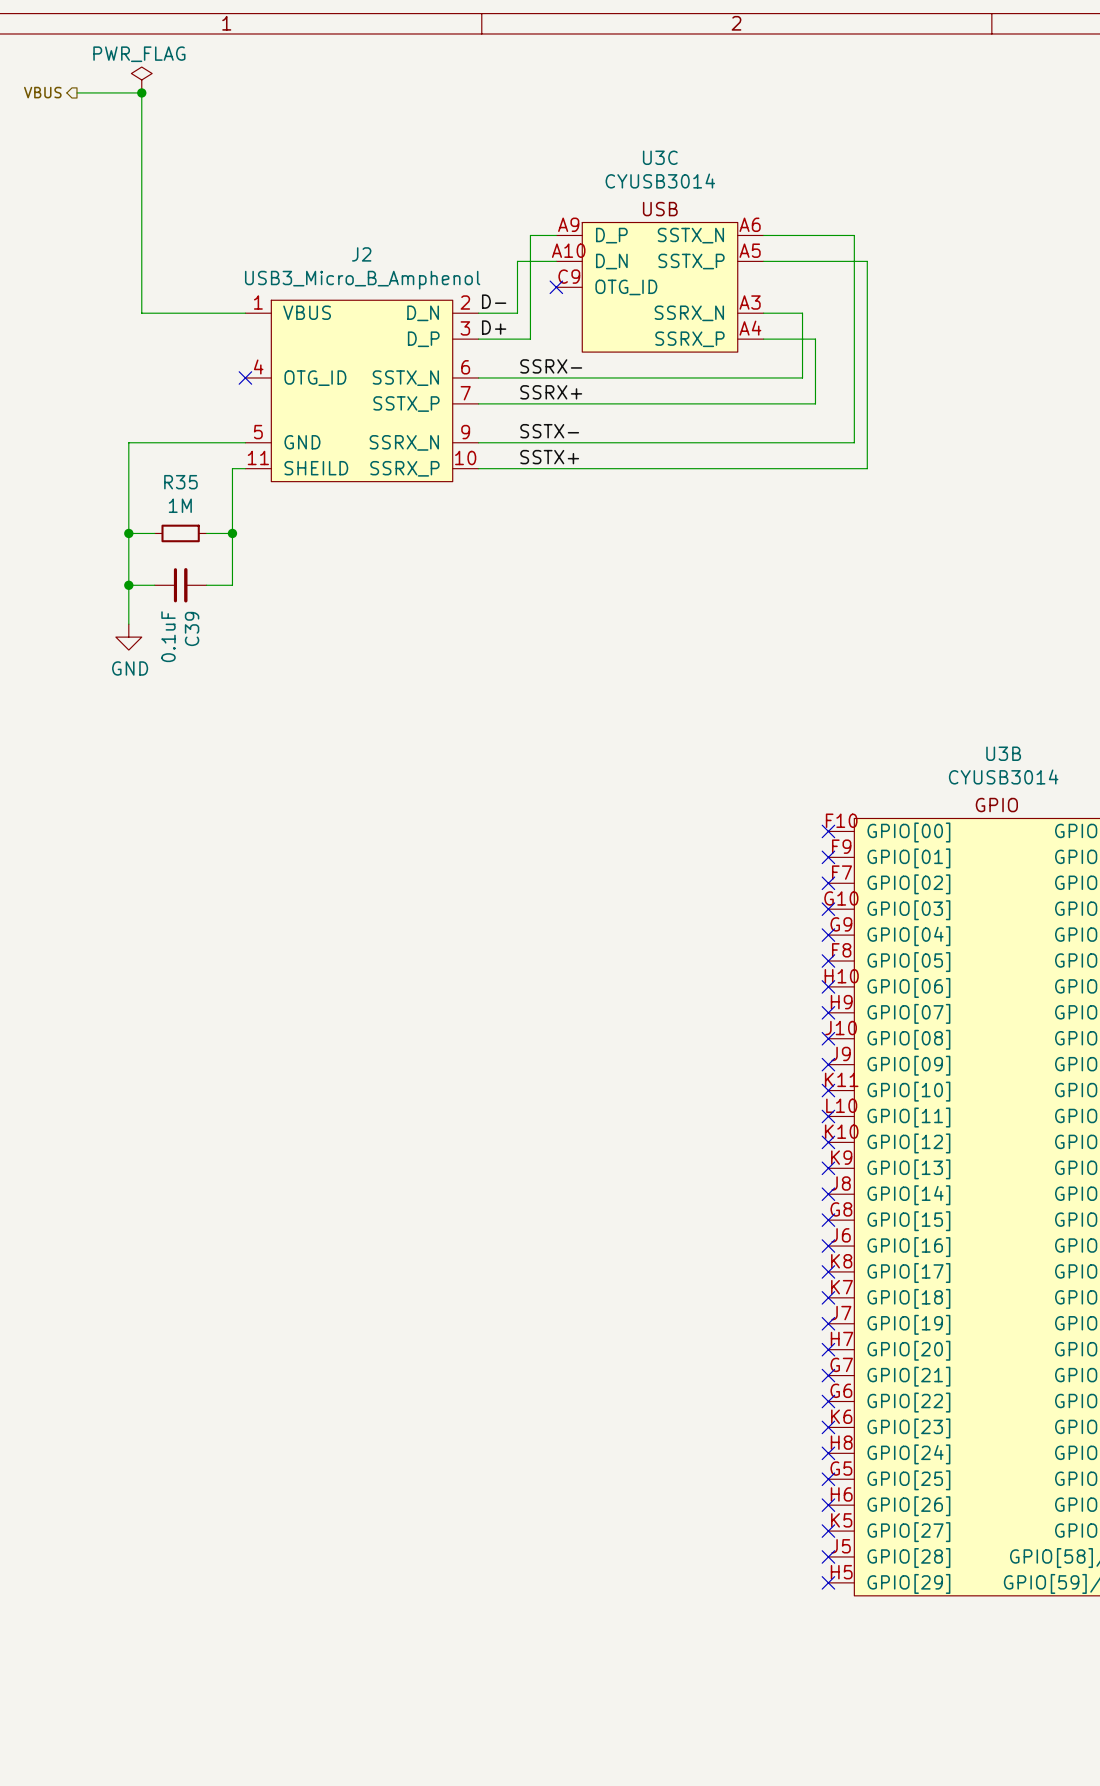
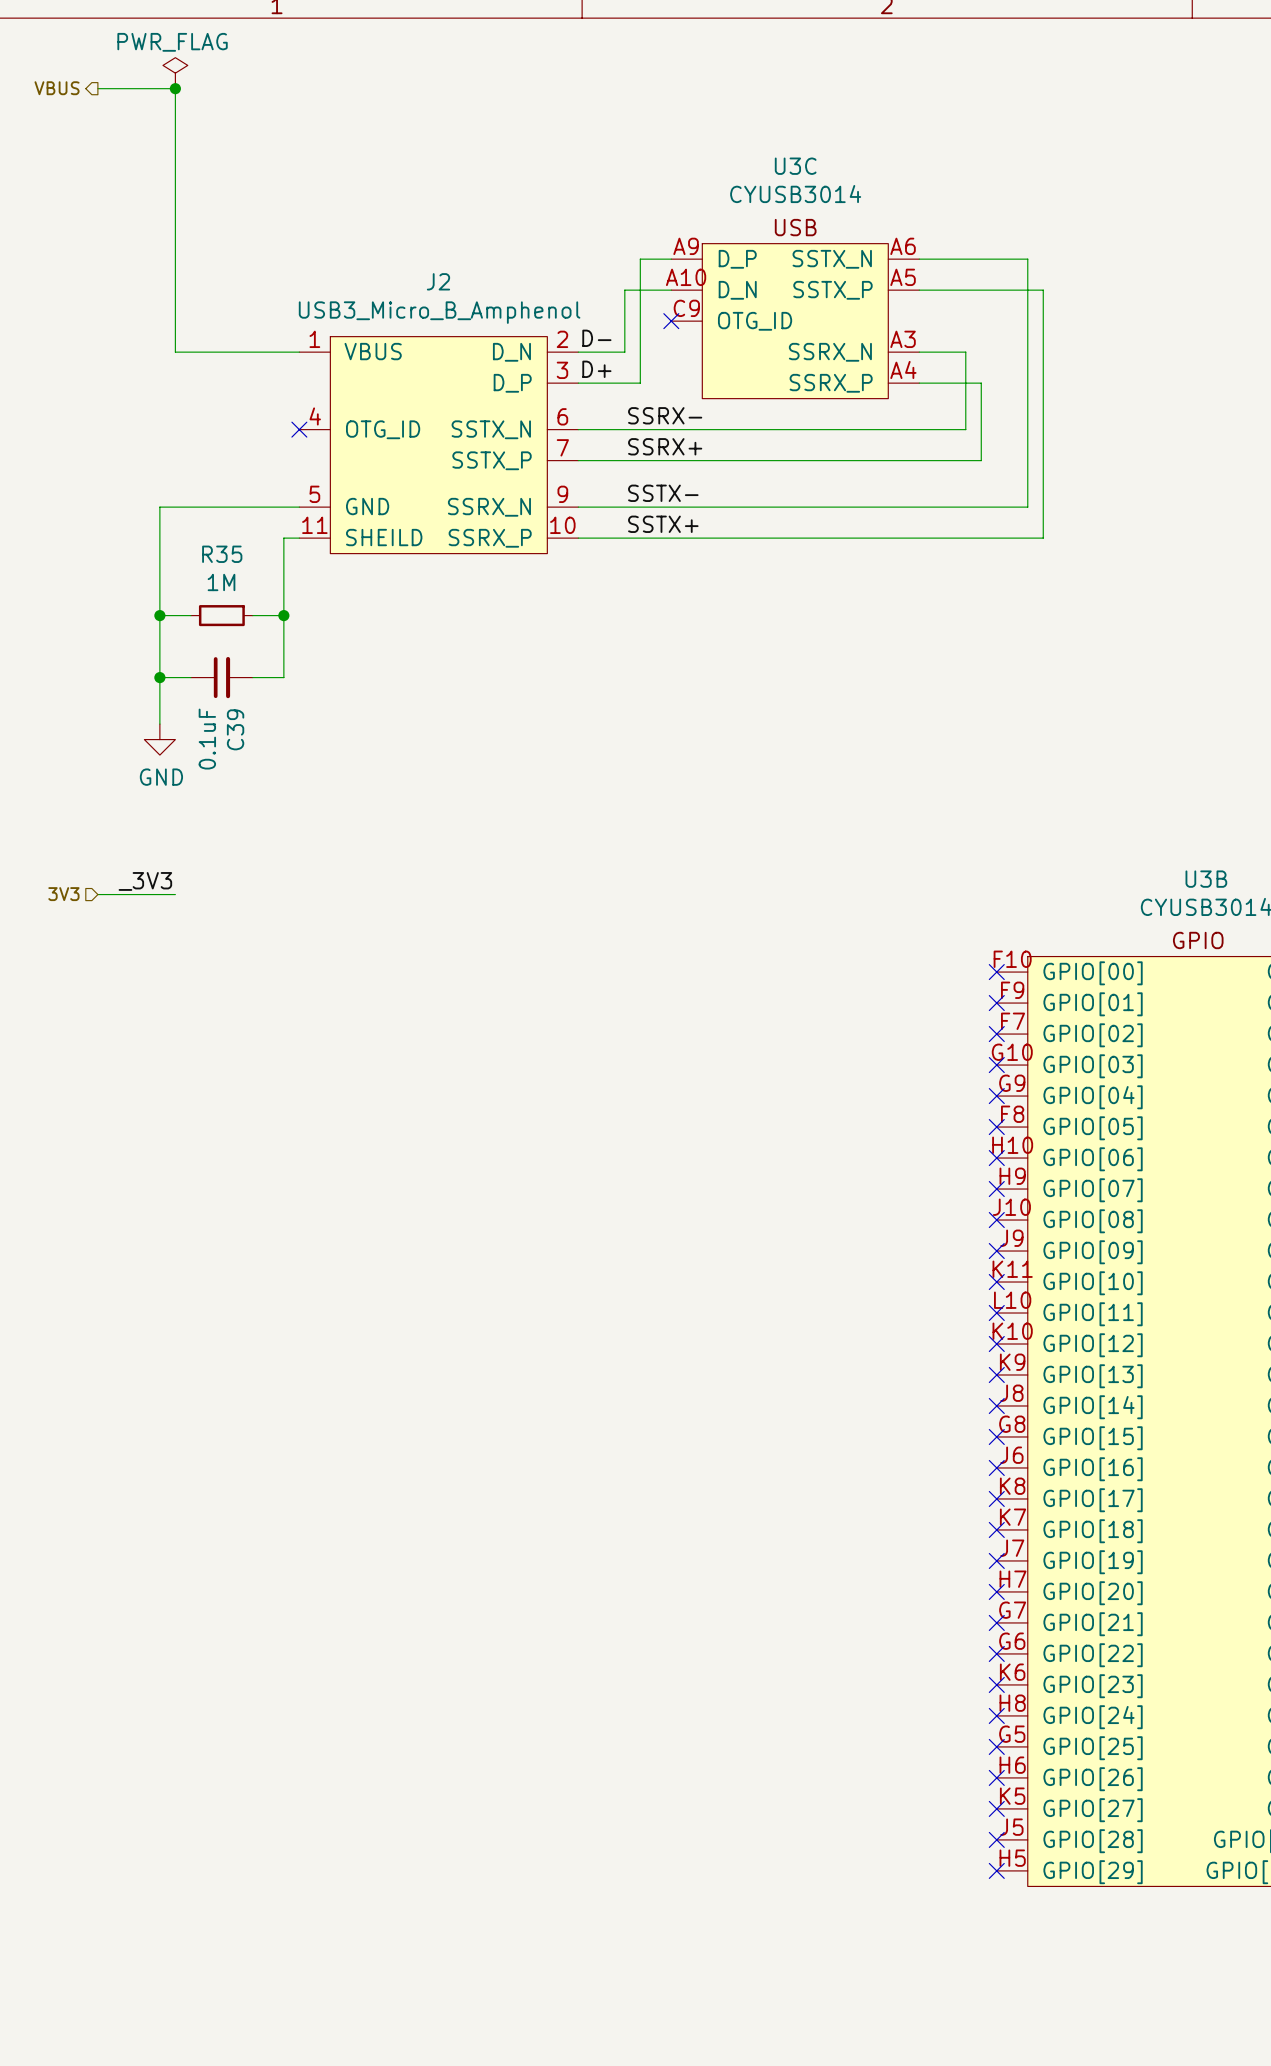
label: none -> _3V3 (145, 881)
hierarchical label: none -> 3V3 (63, 894)
wire: none -> (97, 894) (175, 894)

